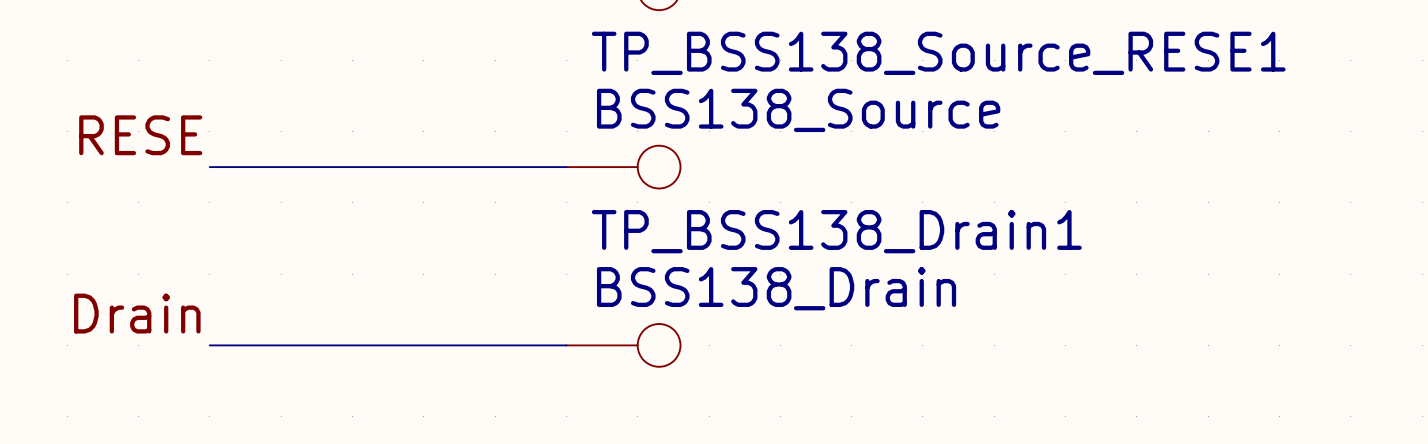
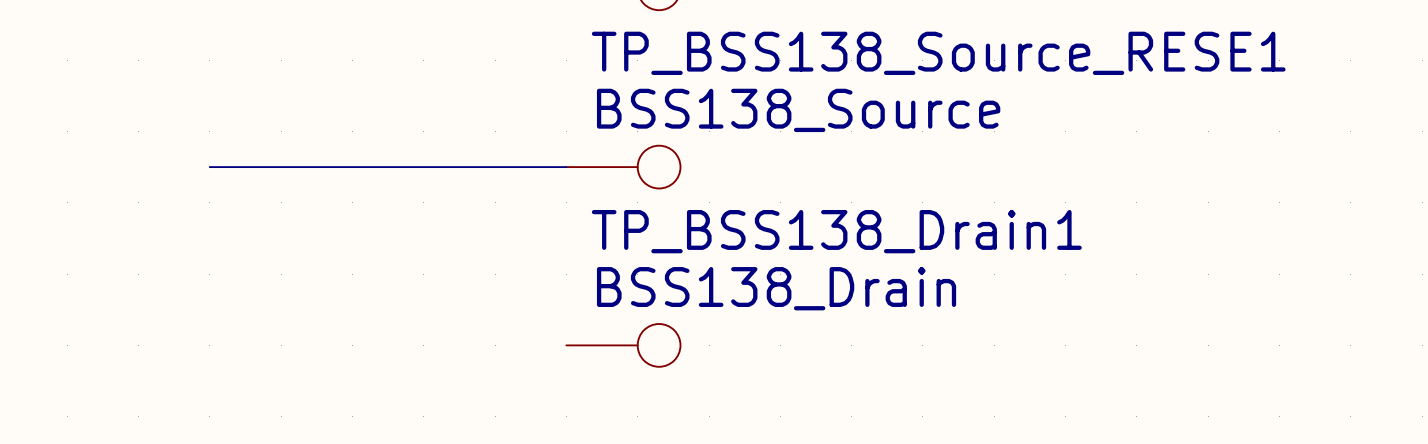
label: RESE (140, 135) -> none
label: Drain (137, 313) -> none
wire: (209, 345) (566, 345) -> none

